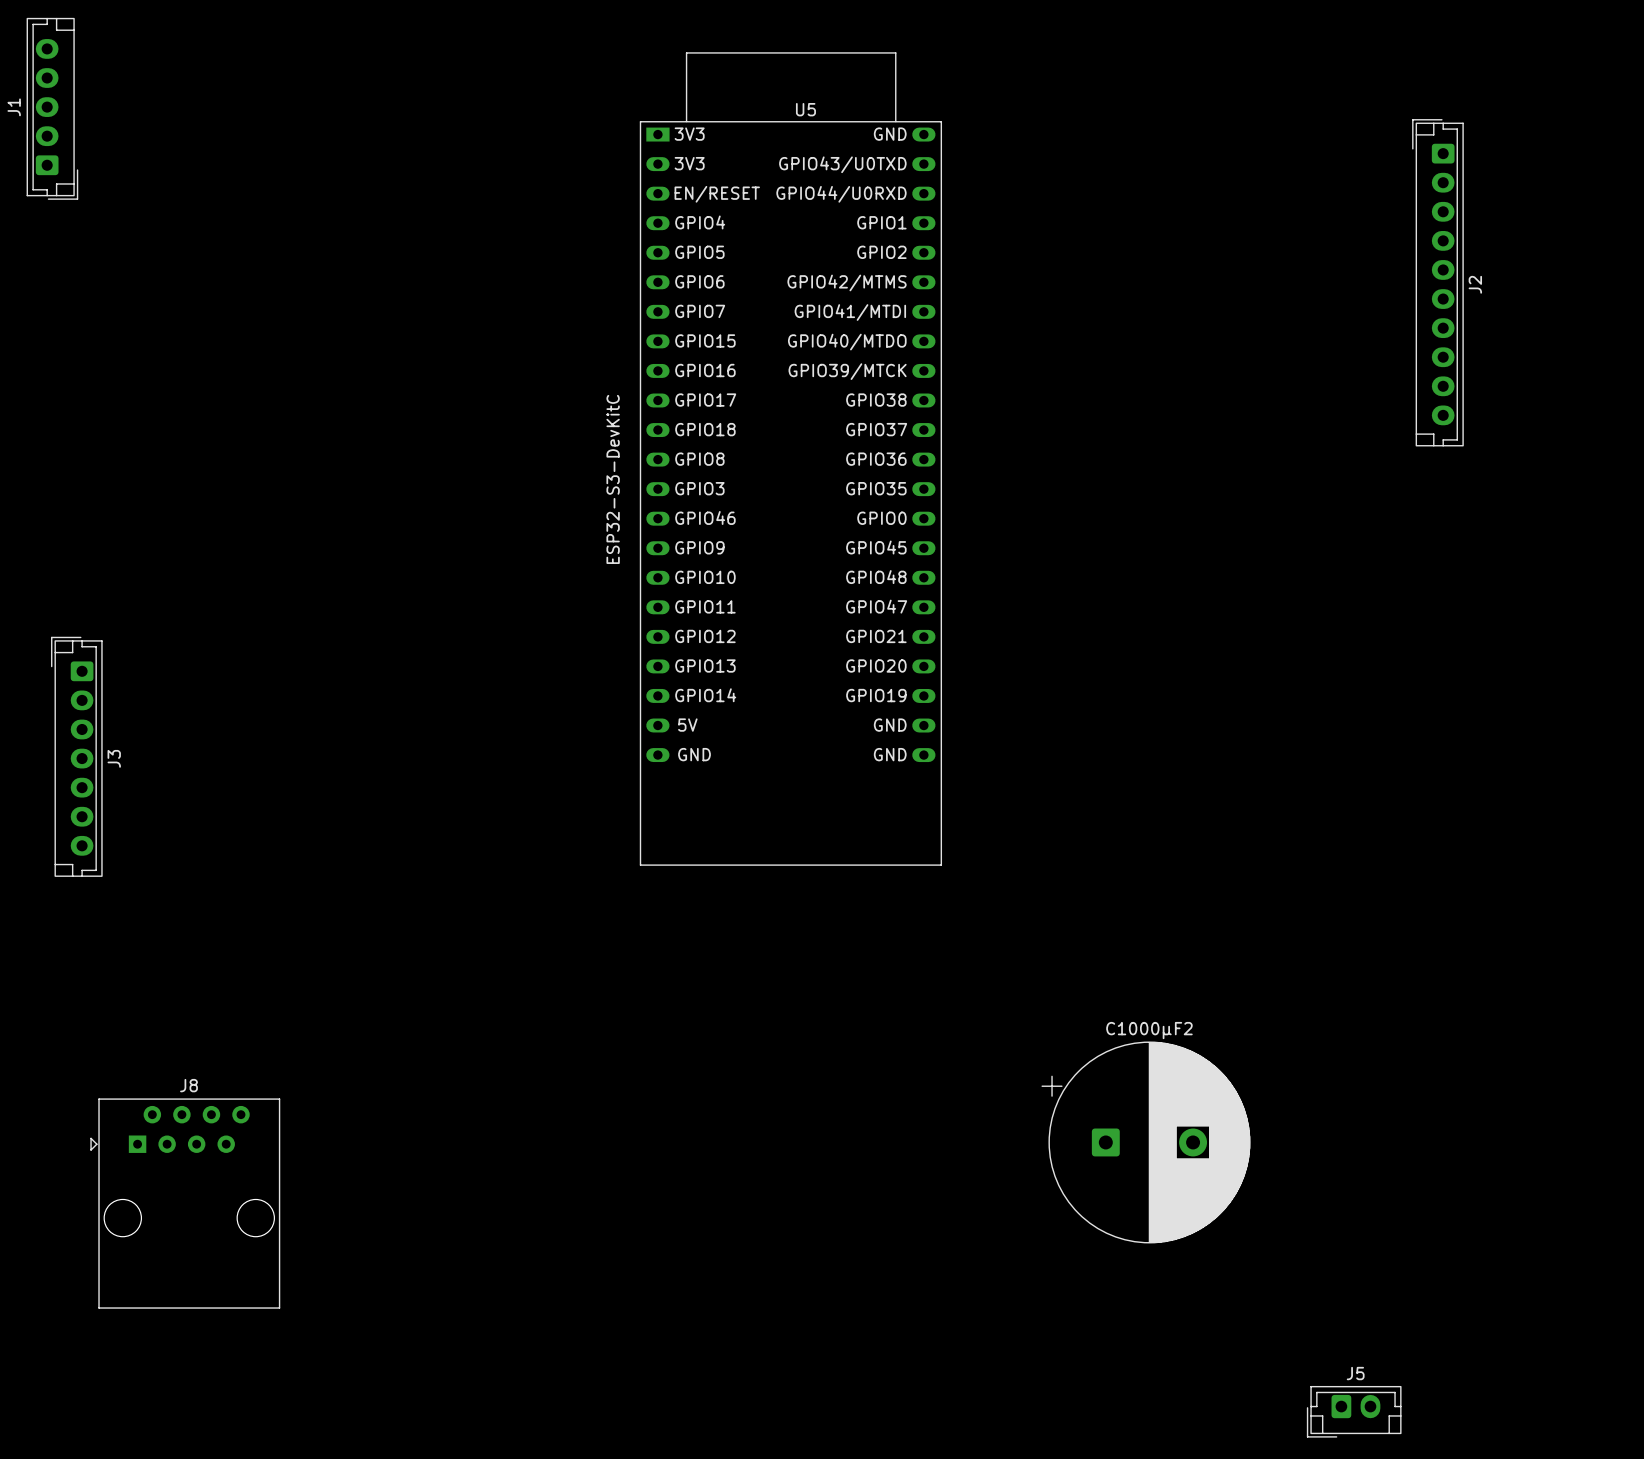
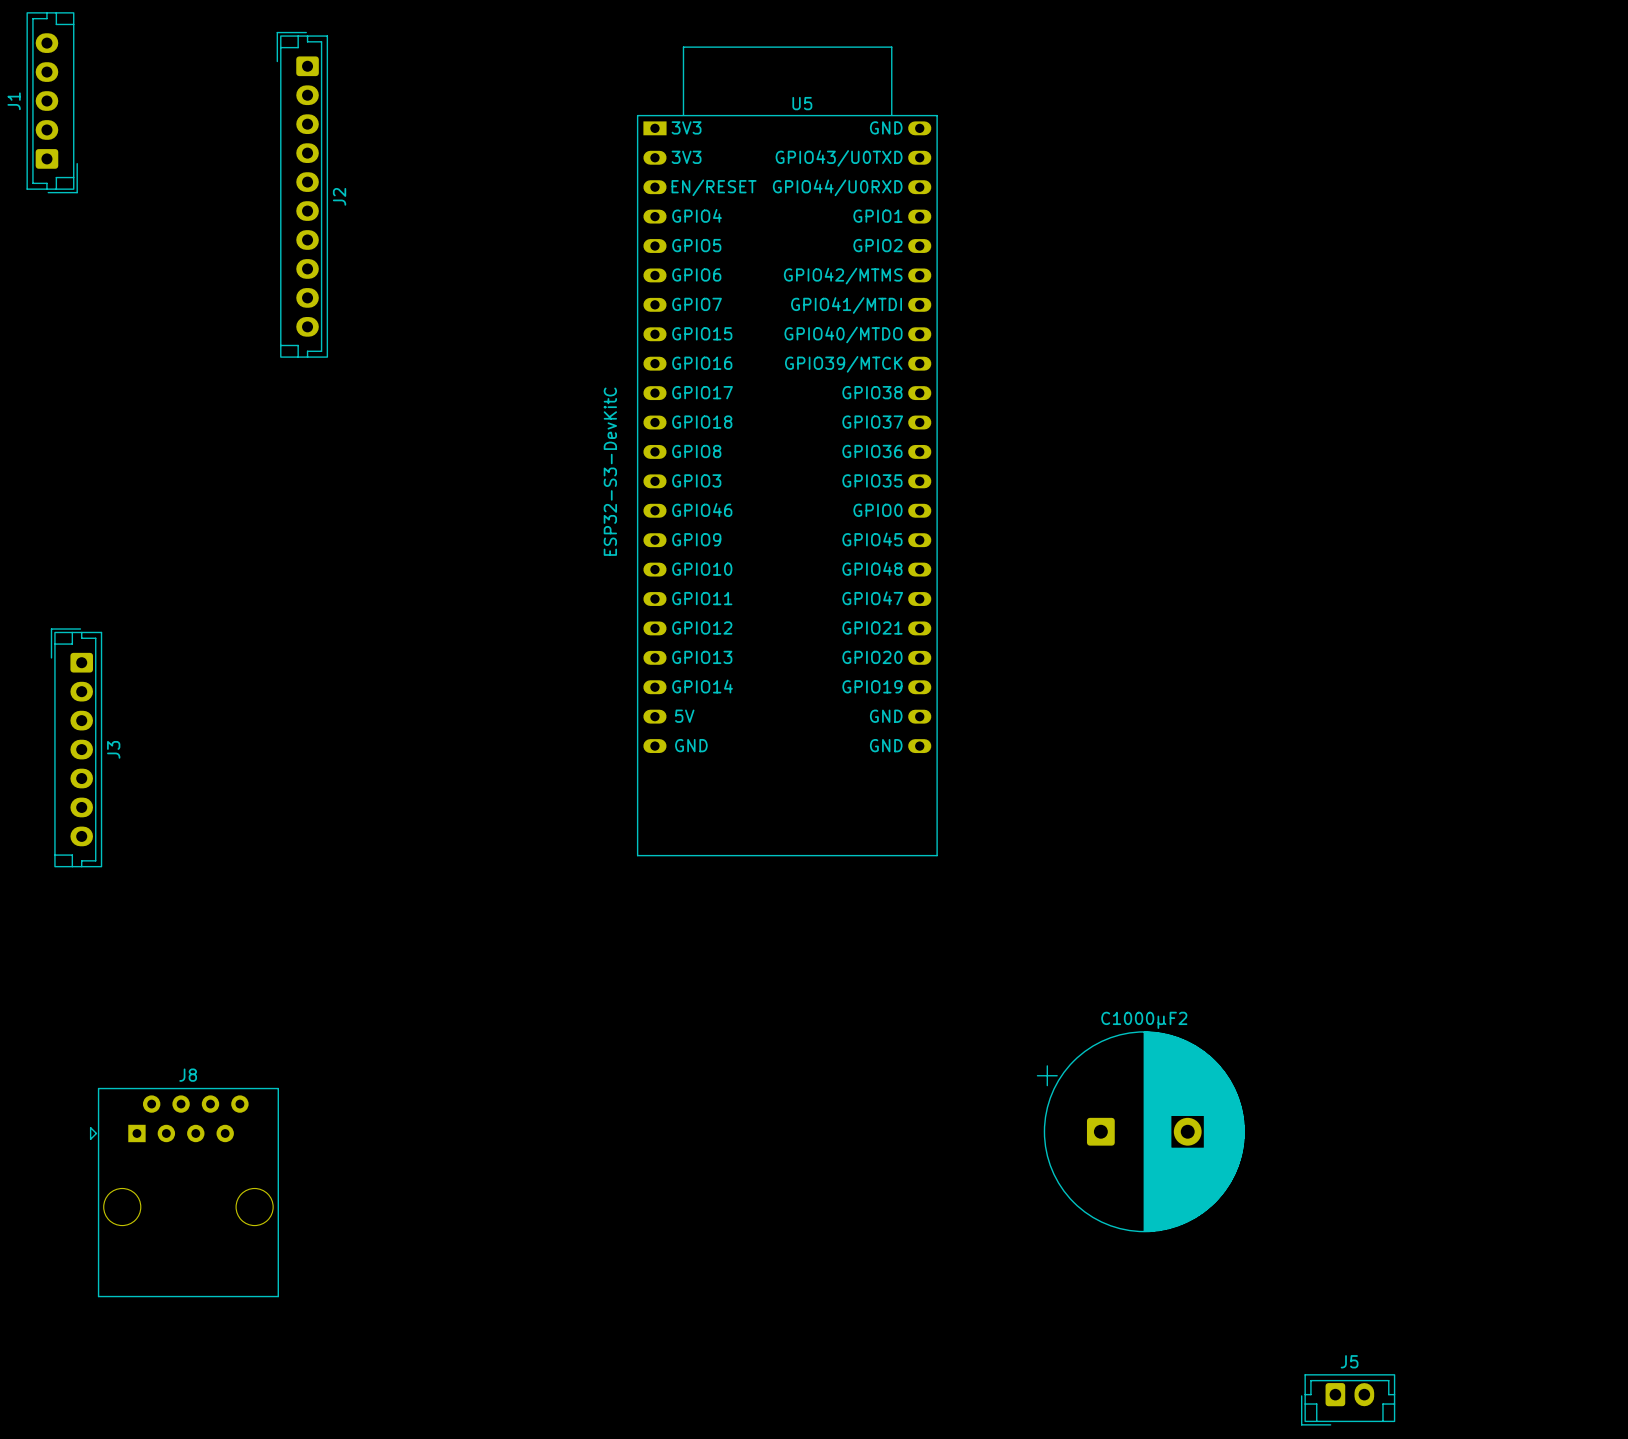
J2 position: (1437, 282) -> (302, 194)

